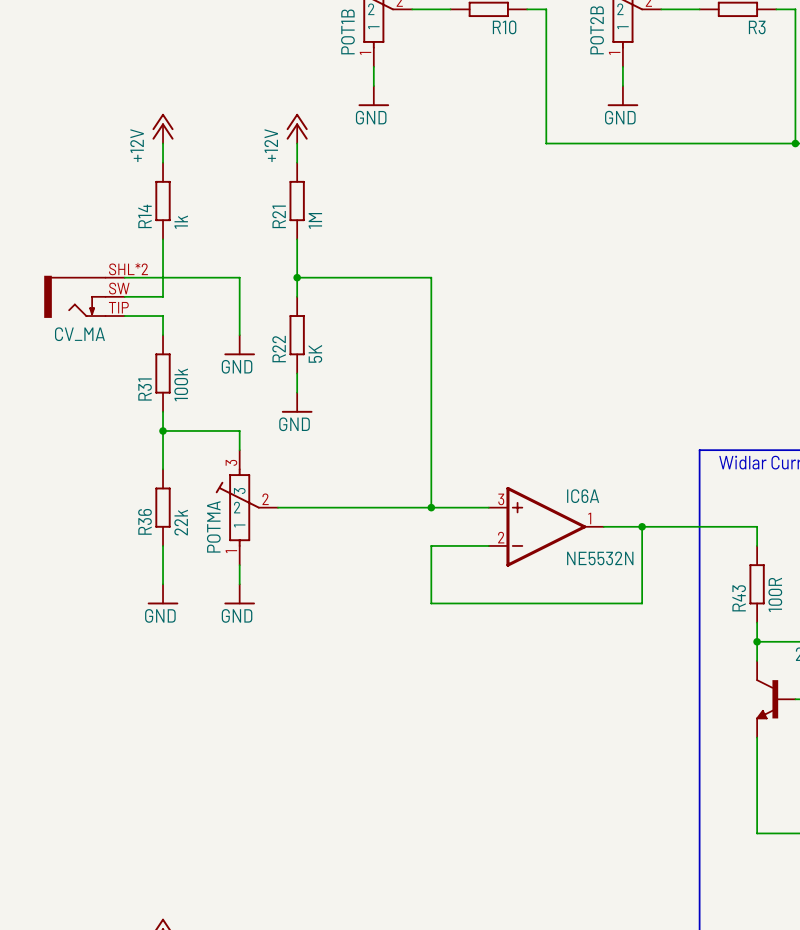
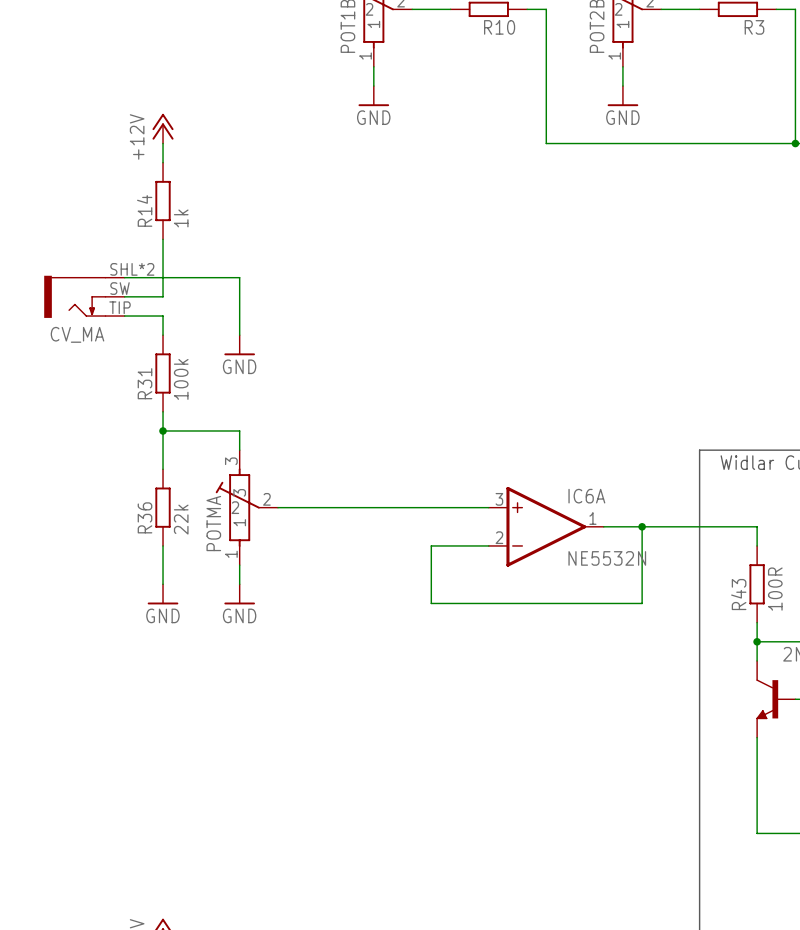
power symbol: +12V (297, 128) -> none
wire: (297, 143) (297, 162) -> none
R21: 1M (297, 201) -> none
wire: (297, 239) (297, 296) -> none
wire: (297, 277) (431, 277) (431, 507) -> none
junction: (297, 277) -> none
R22: 5K (297, 335) -> none
wire: (297, 373) (297, 392) -> none
power symbol: GND (297, 402) -> none
junction: (431, 507) -> none

